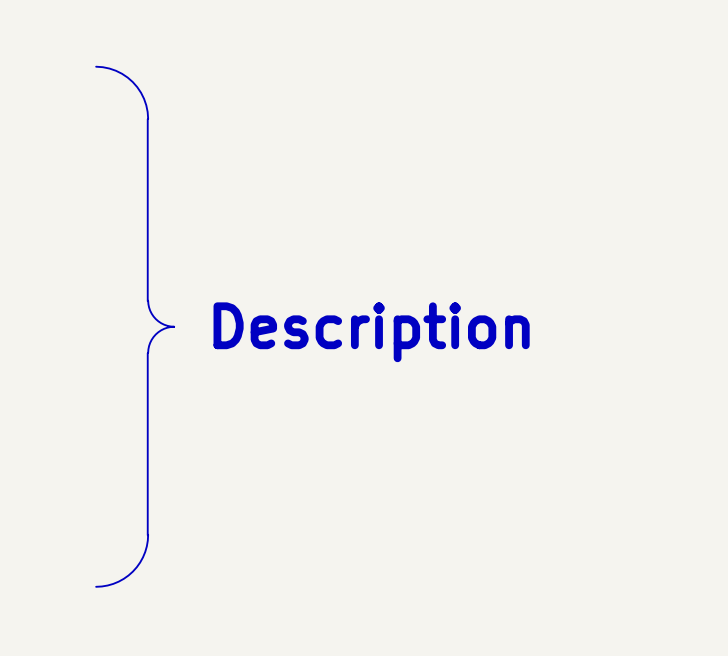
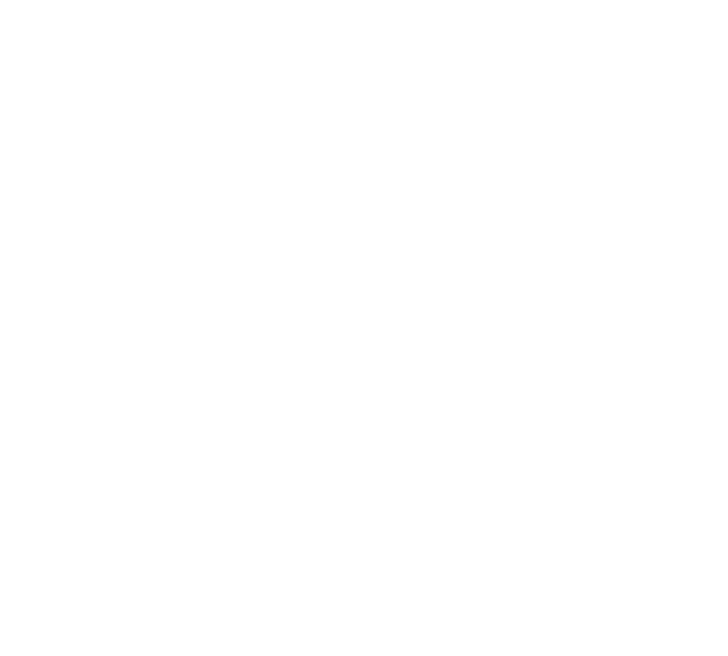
line: (96, 66) (115, 70) (132, 82) (144, 98) (148, 118) -> none
line: (147, 119) (147, 301) -> none
line: (148, 300) (150, 310) (155, 319) (164, 324) (174, 326) (164, 328) (155, 334) (150, 342) (148, 352) -> none
text: Description (371, 332) -> none
line: (147, 353) (147, 535) -> none
line: (148, 534) (145, 551) (132, 571) (118, 581) (96, 586) -> none

